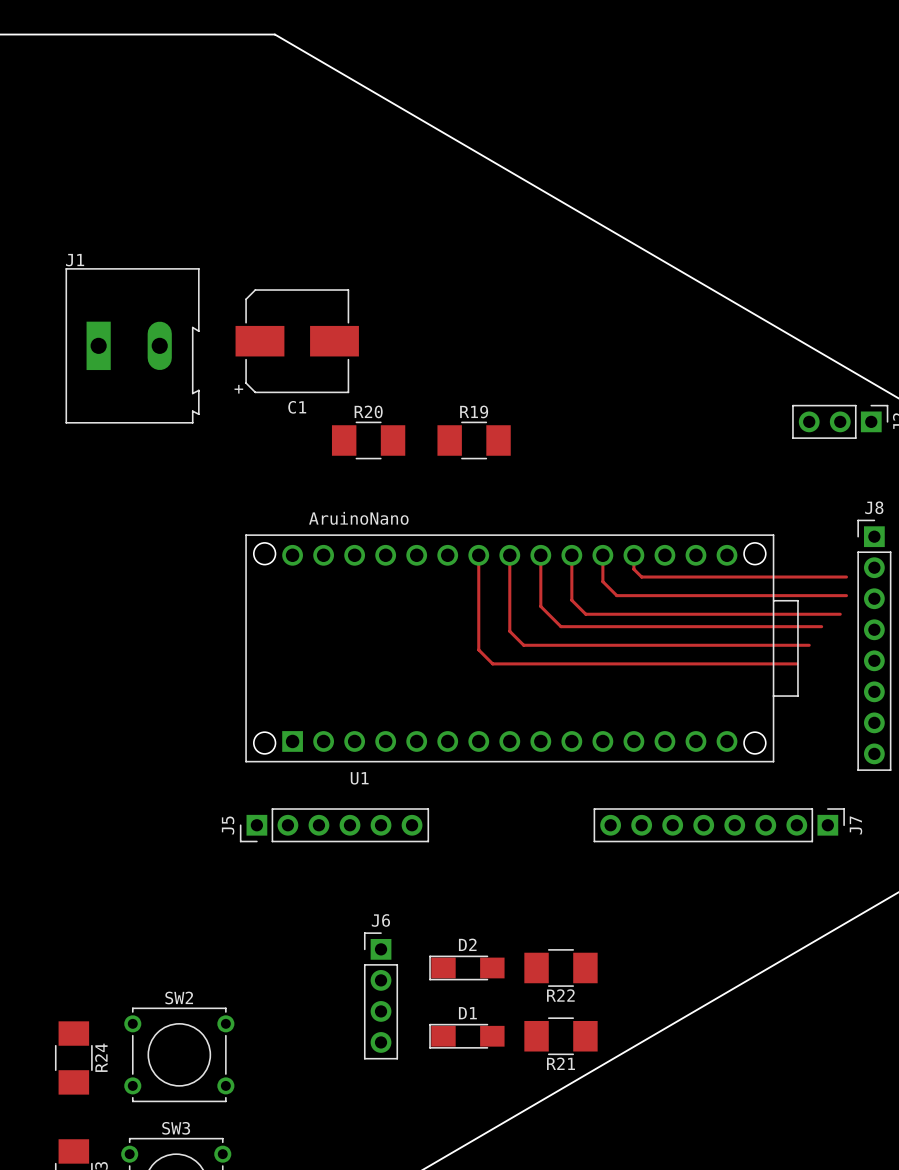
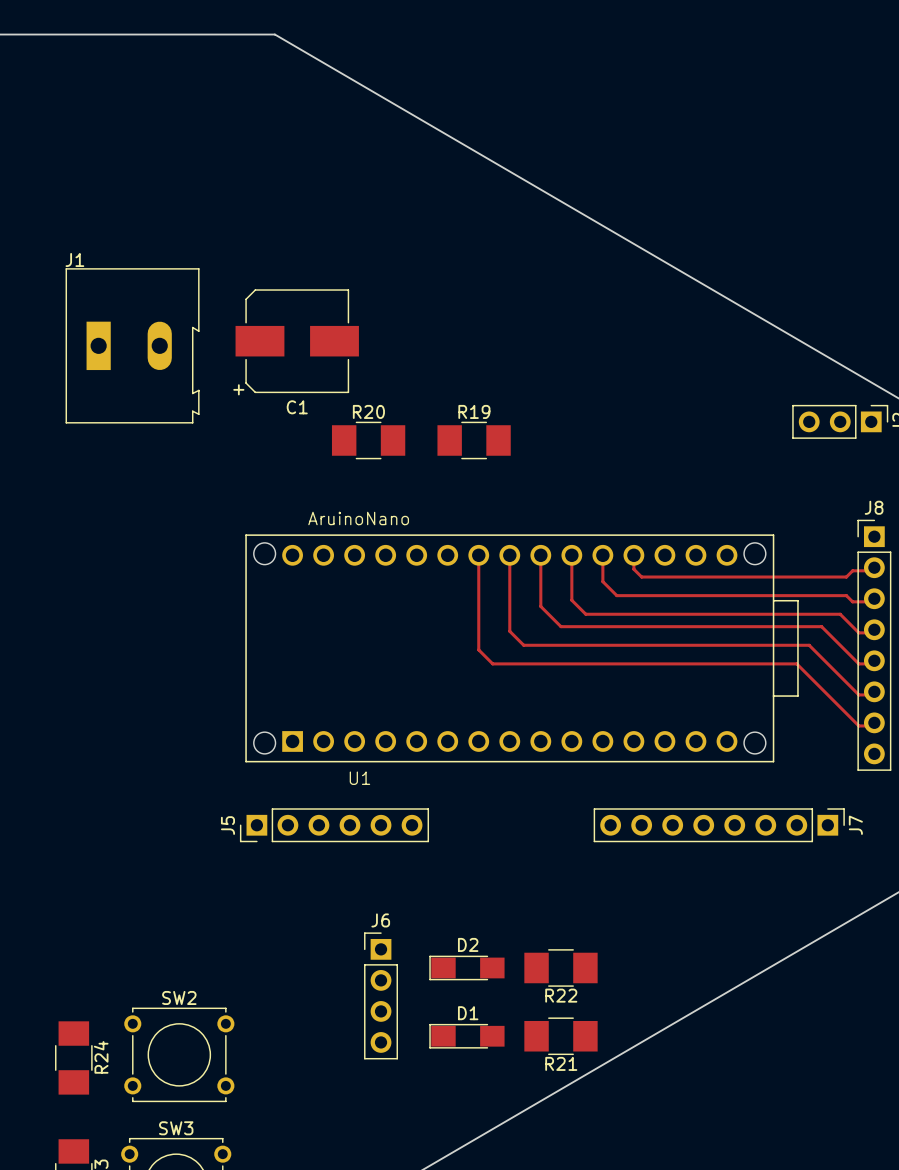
track: none -> (874, 570) (852, 570) (846, 577)
track: none -> (846, 595) (852, 601) (874, 601)
track: none -> (840, 614) (858, 632) (874, 632)
track: none -> (821, 626) (858, 663) (874, 663)
track: none -> (809, 645) (858, 694) (874, 694)
track: none -> (796, 663) (858, 725) (874, 725)

